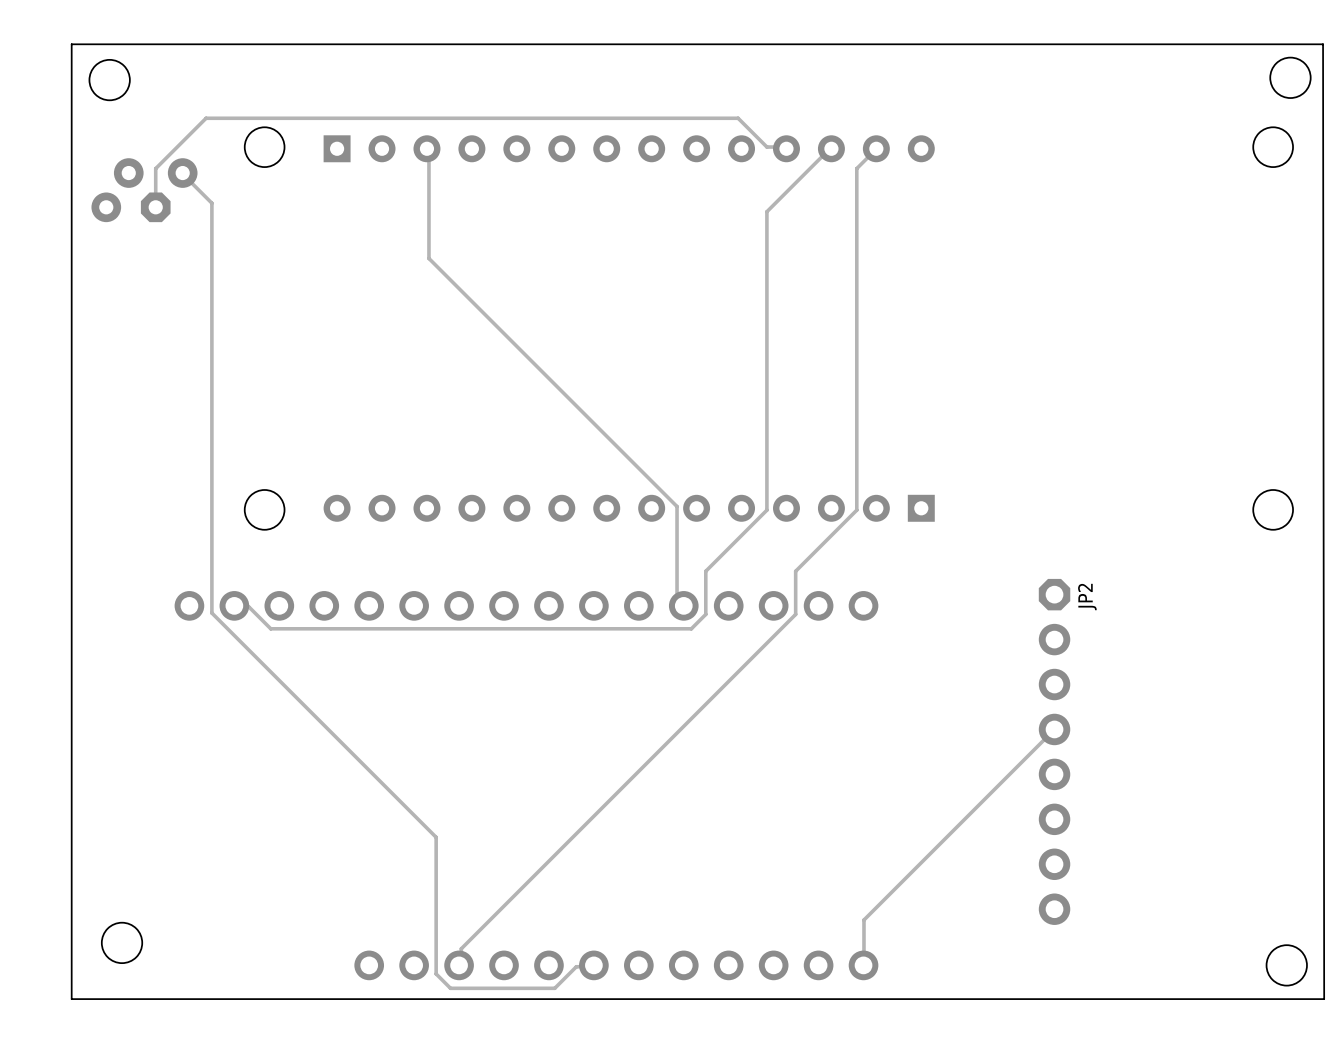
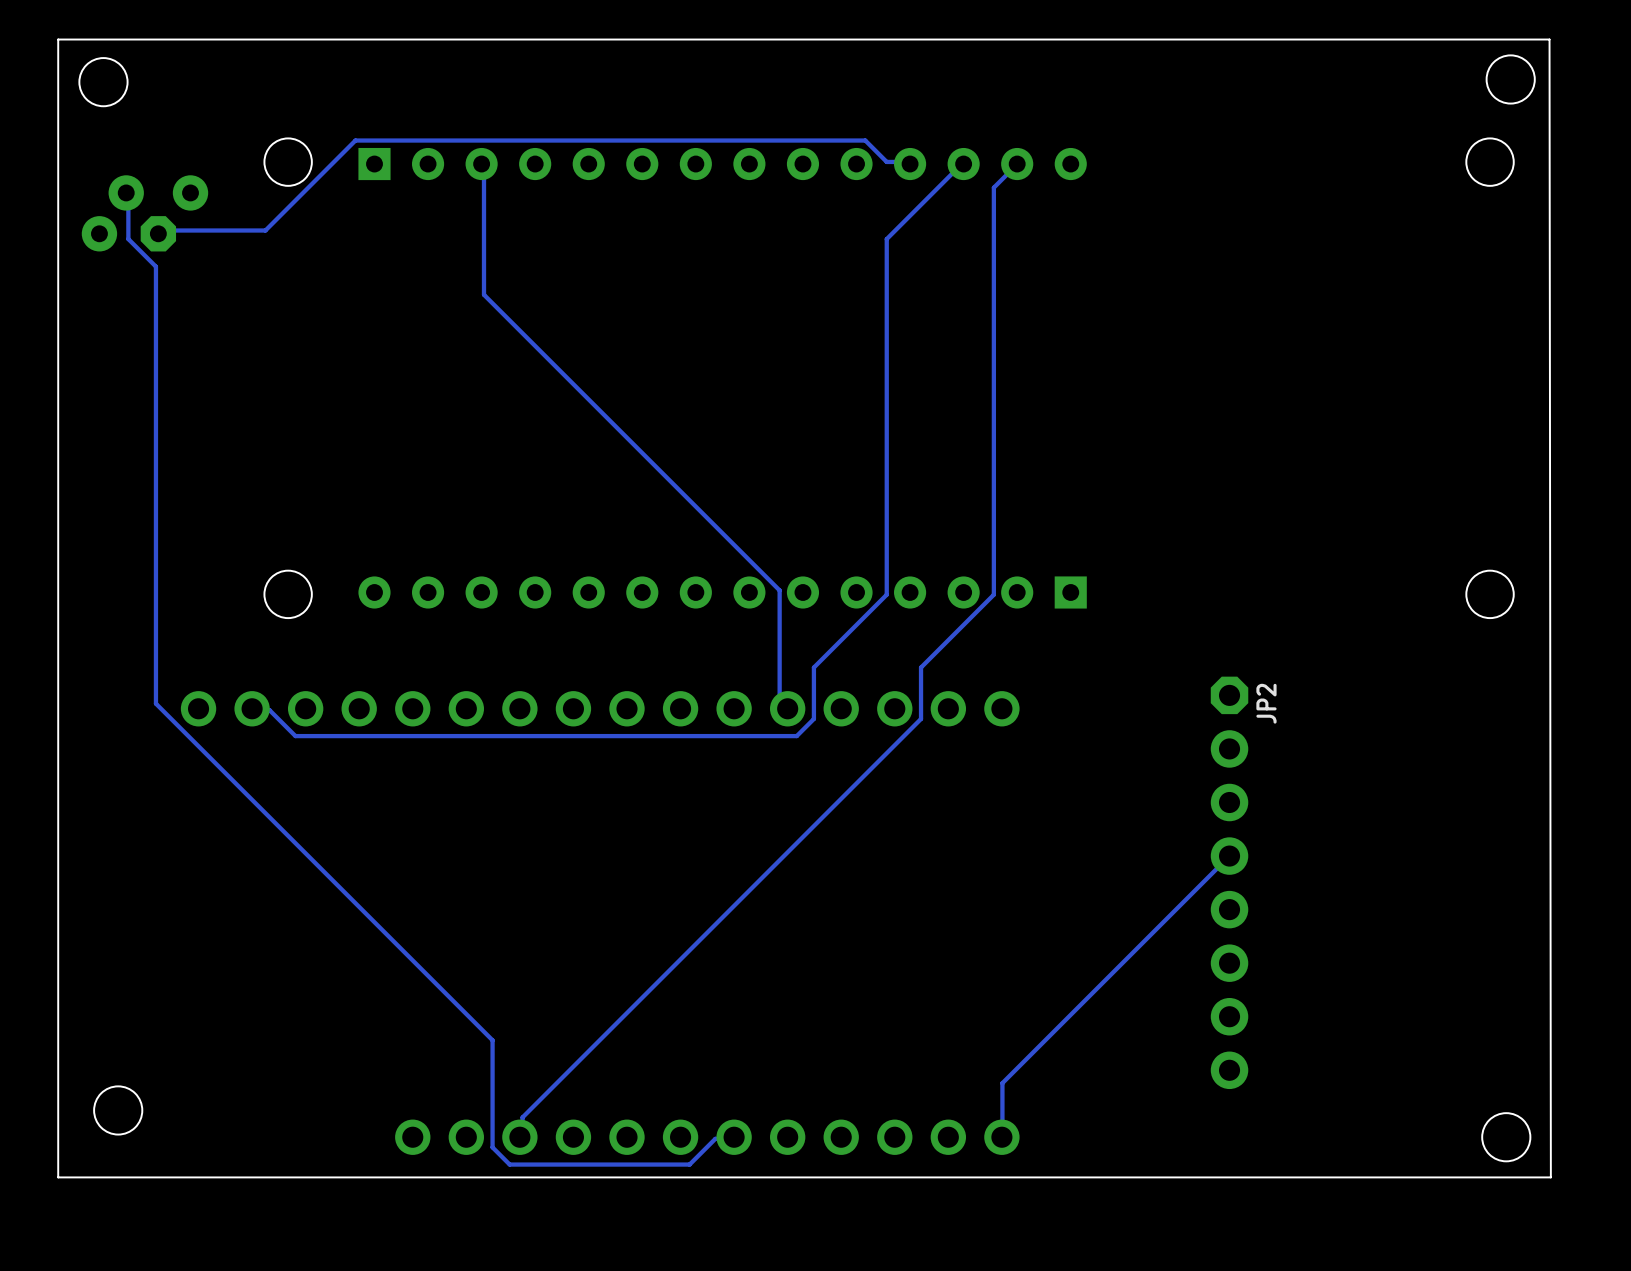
track: (748, 129) (738, 118) (206, 118) (155, 168) (155, 204) -> (865, 140) (355, 140) (265, 230) (158, 230)
track: (182, 173) (211, 203) (211, 613) (436, 837) (436, 884) -> (126, 192) (128, 196) (128, 239) (155, 266) (155, 703) (492, 1040)
track: (593, 965) (576, 966) (554, 988) -> (734, 1137) (715, 1138) (689, 1164) (633, 1164)

